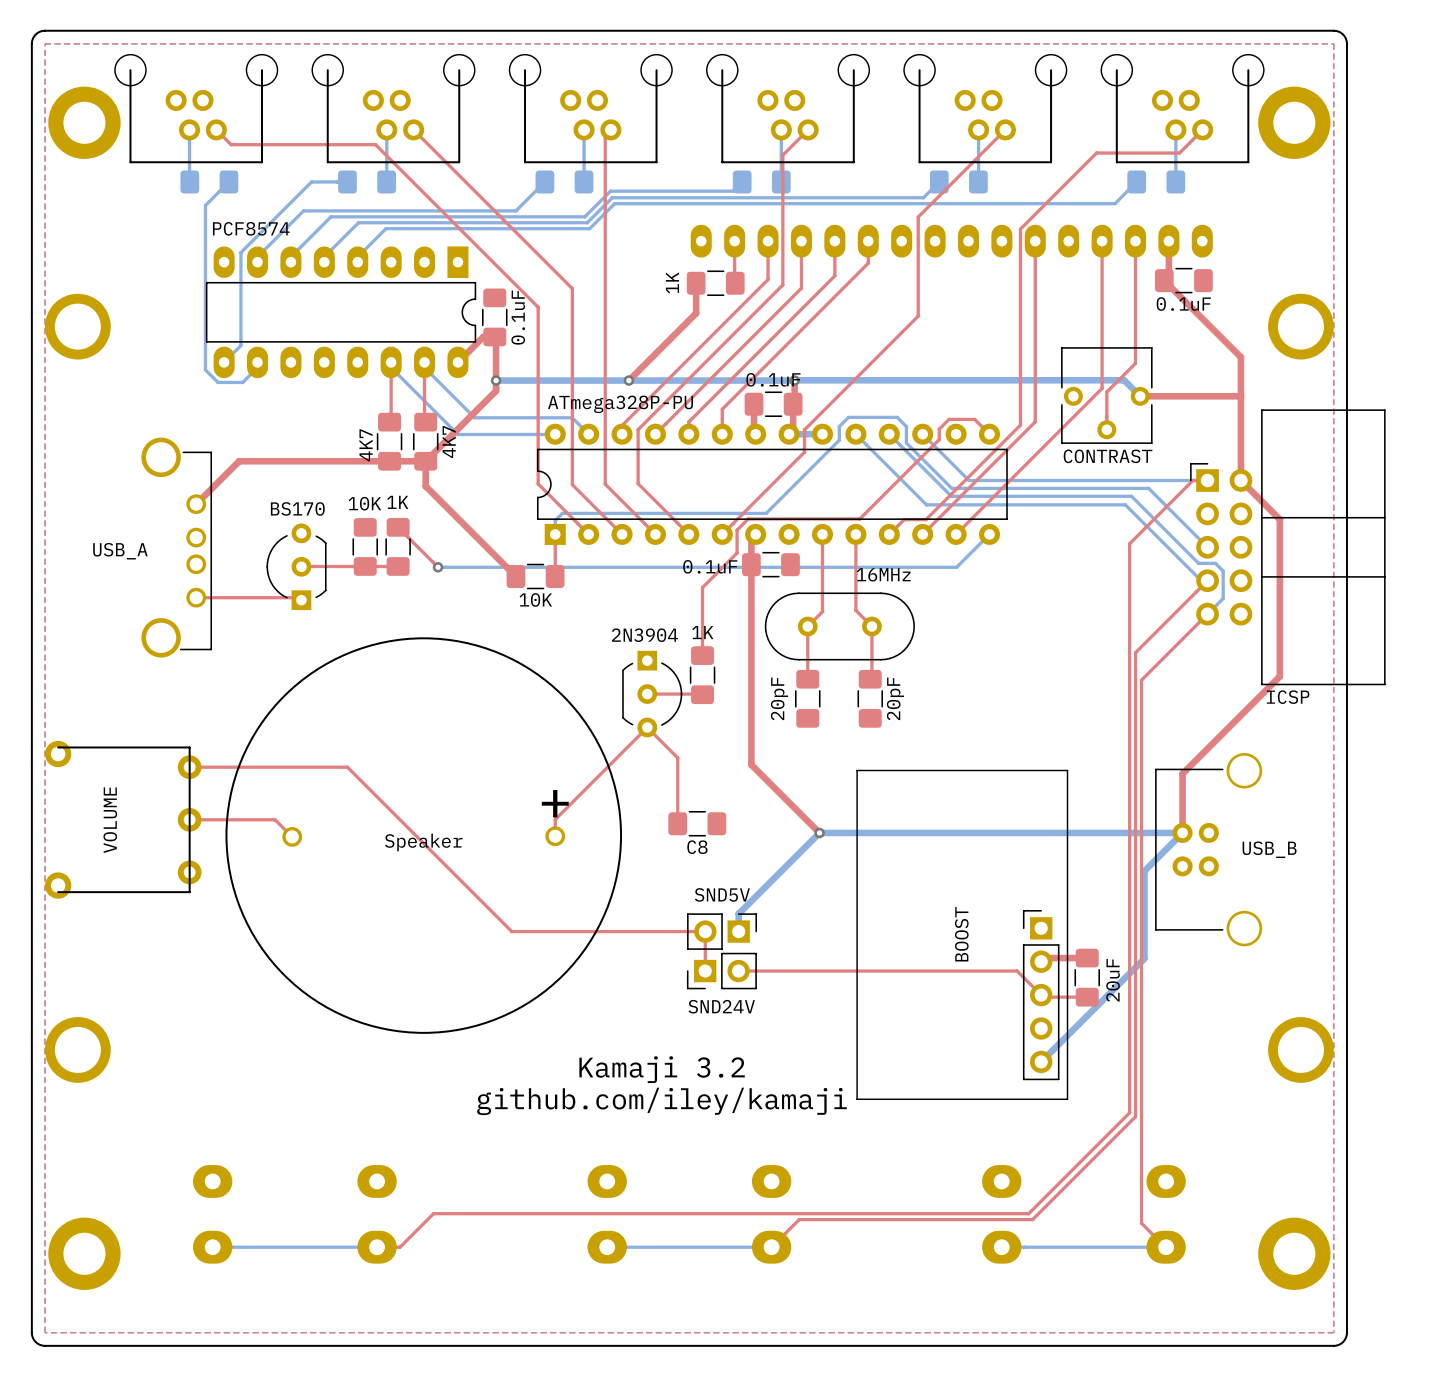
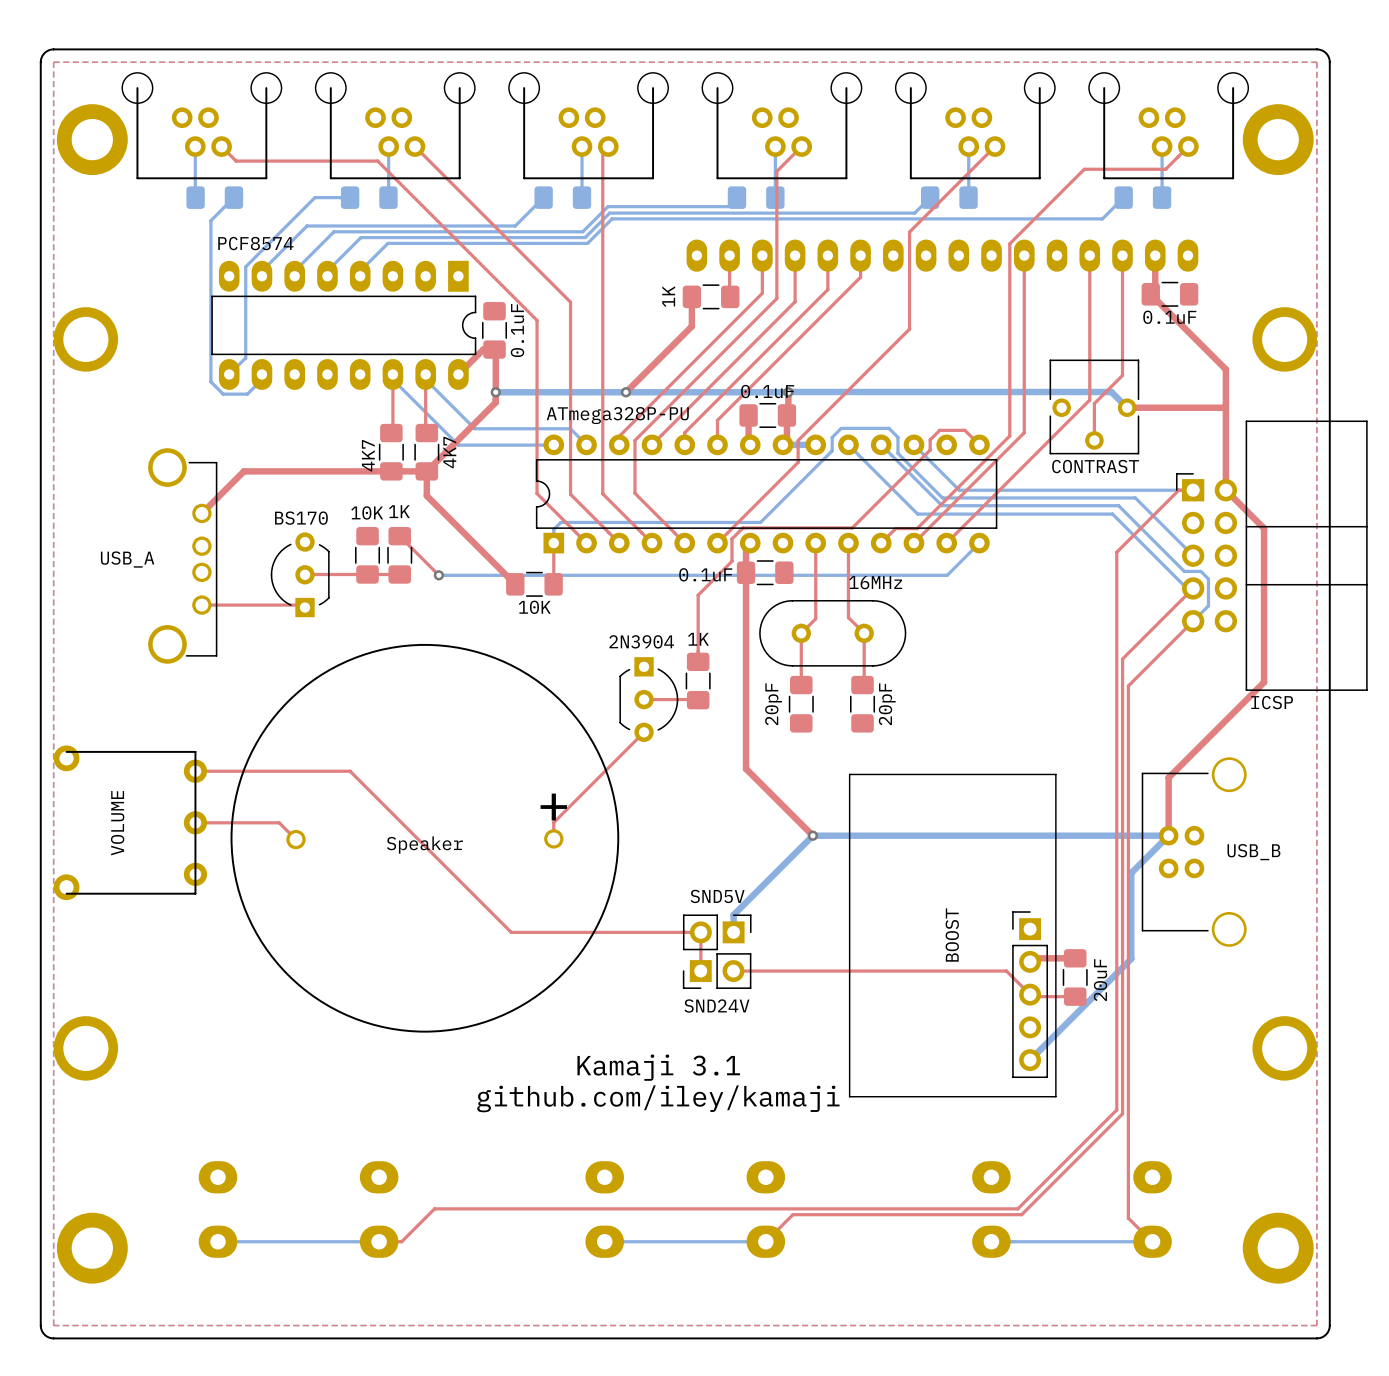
top track: (647, 727) (677, 757) (677, 823) -> none
C8: (697, 823) -> none
text: Kamaji 3.2 (662, 1069) -> Kamaji 3.1 (658, 1067)

